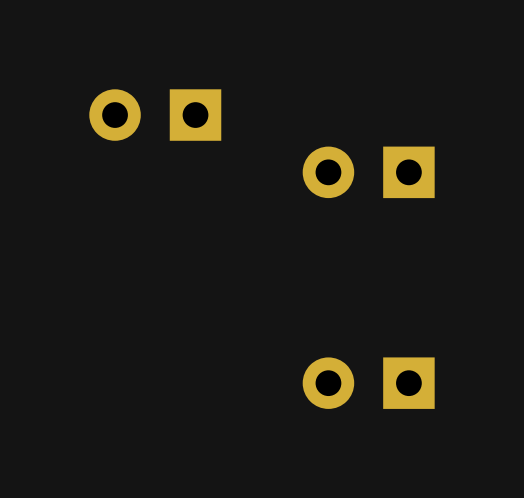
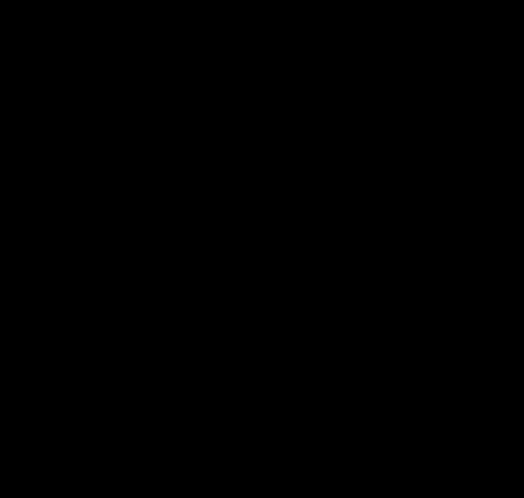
part: (155, 115) -> none
part: (368, 172) -> none
part: (368, 383) -> none

